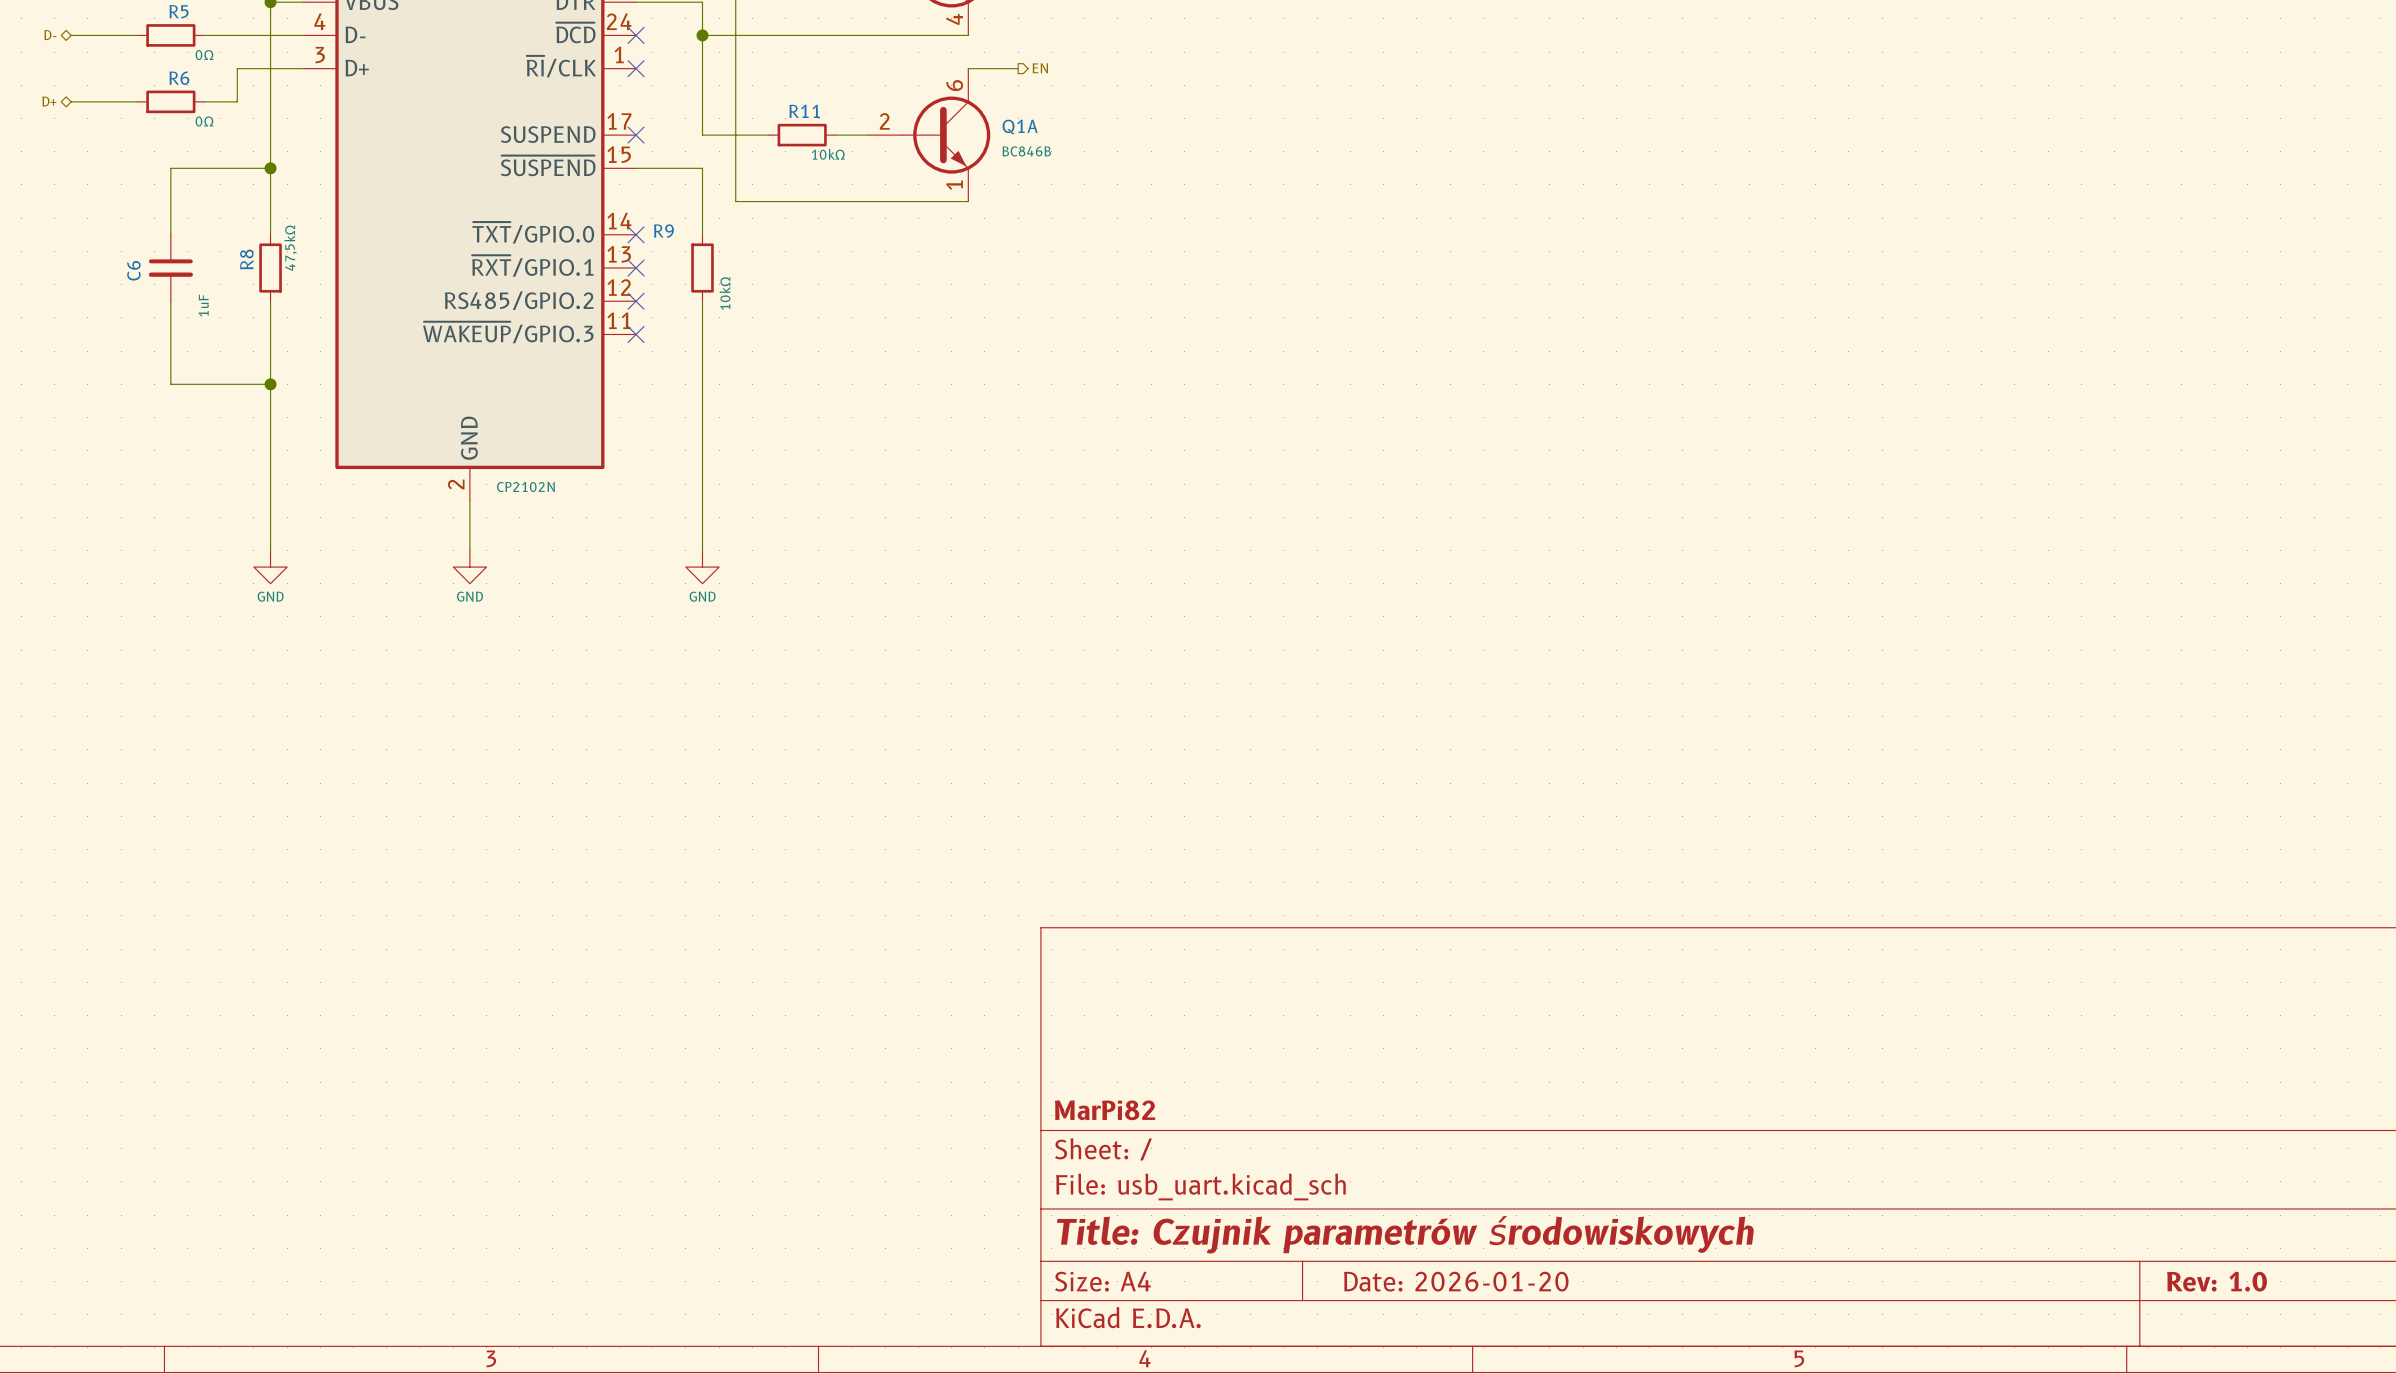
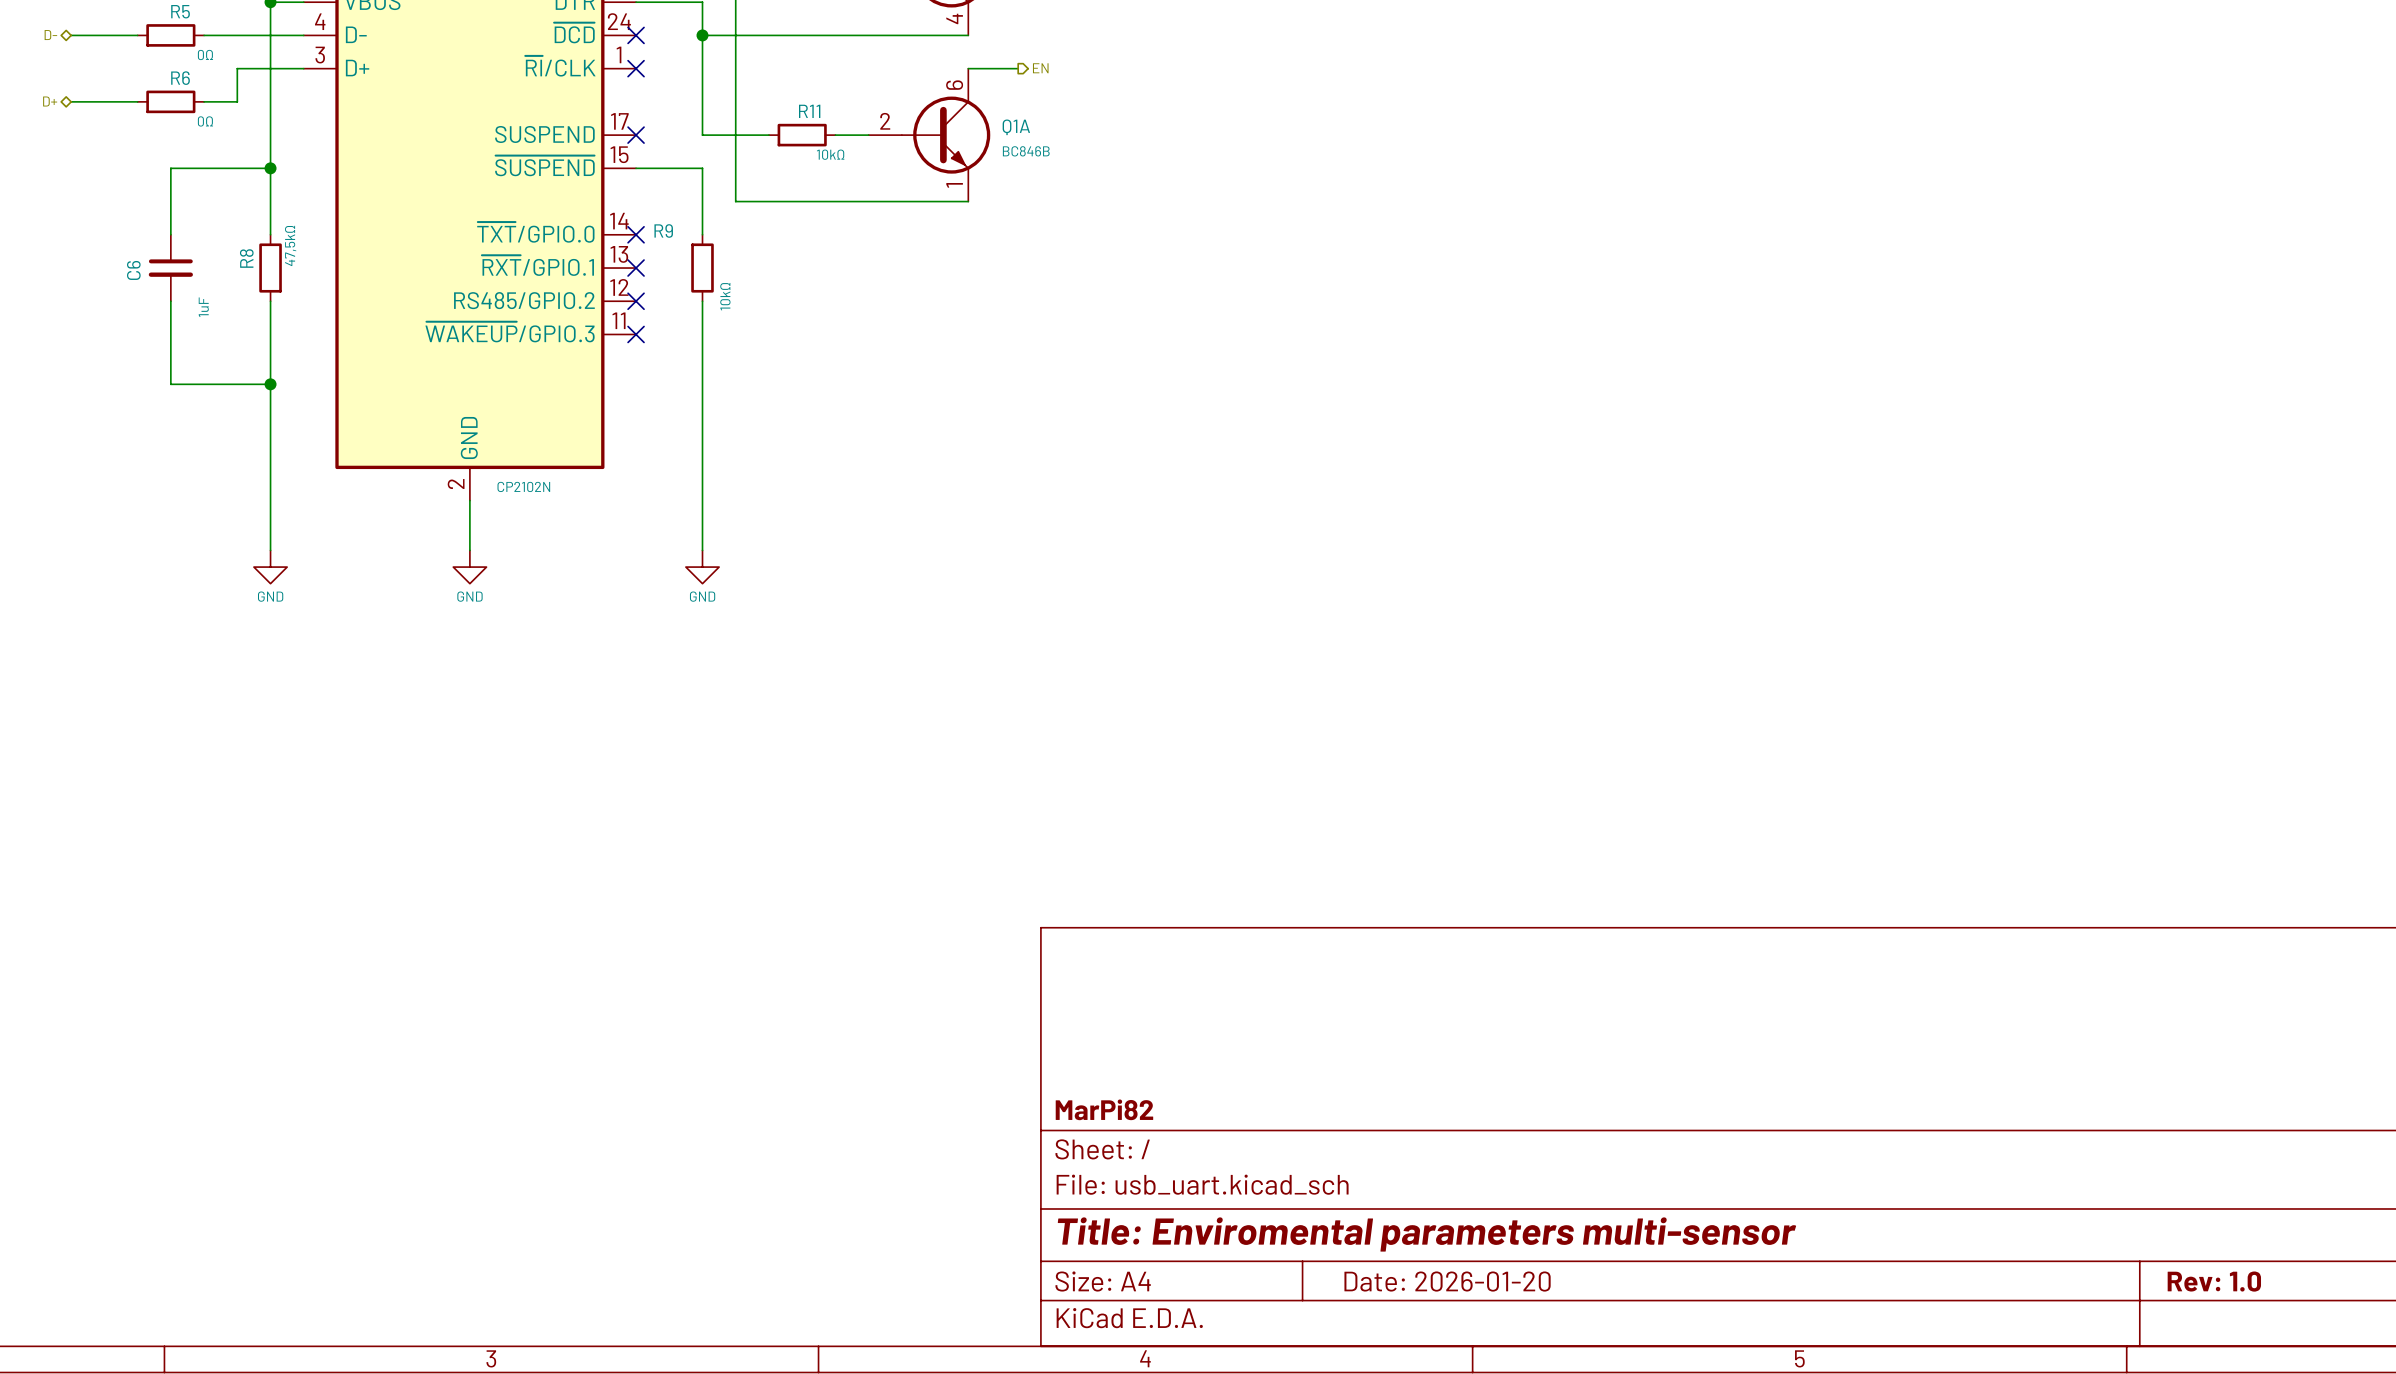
title block: Title: Czujnik parametrów środowiskowych (1405, 1234) -> Title: Enviromental parameters multi-sensor (1426, 1234)

